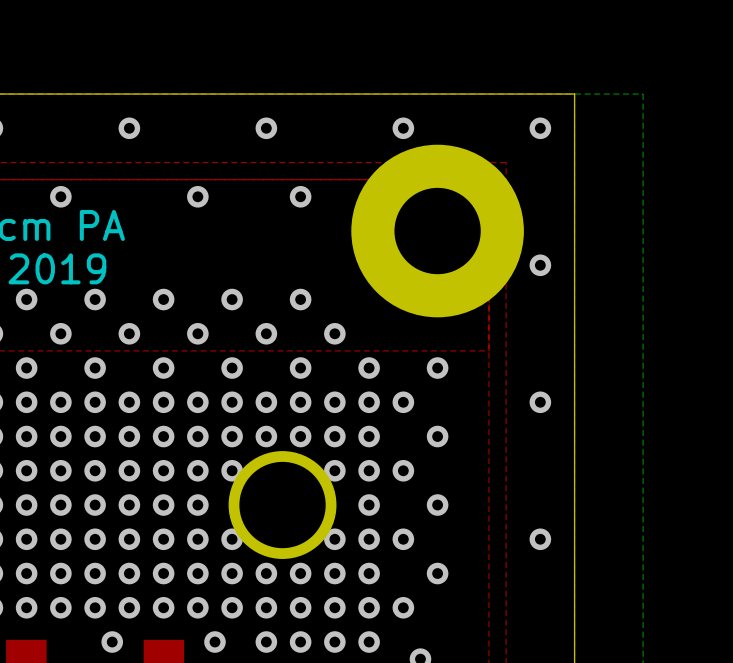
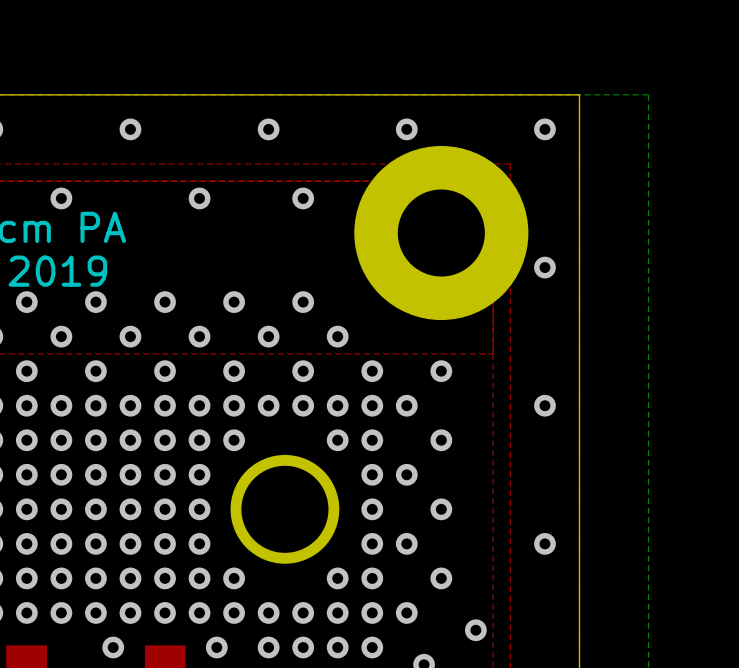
via: (266, 436) -> none
via: (300, 436) -> none
via: (232, 470) -> none
via: (334, 470) -> none
via: (232, 539) -> none
via: (334, 539) -> none
via: (266, 573) -> none
via: (300, 573) -> none
via: none -> (475, 630)

